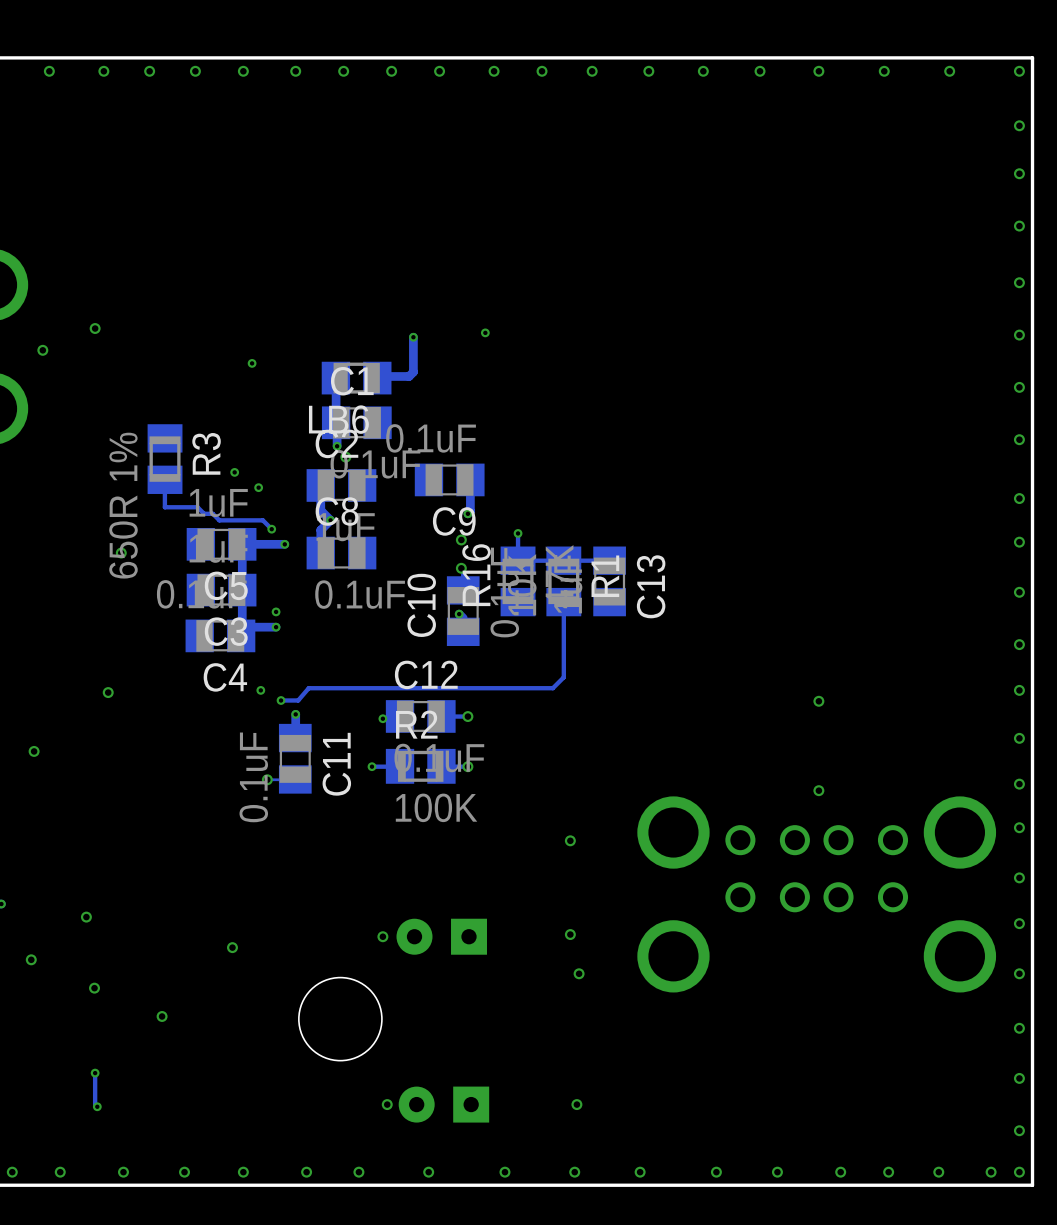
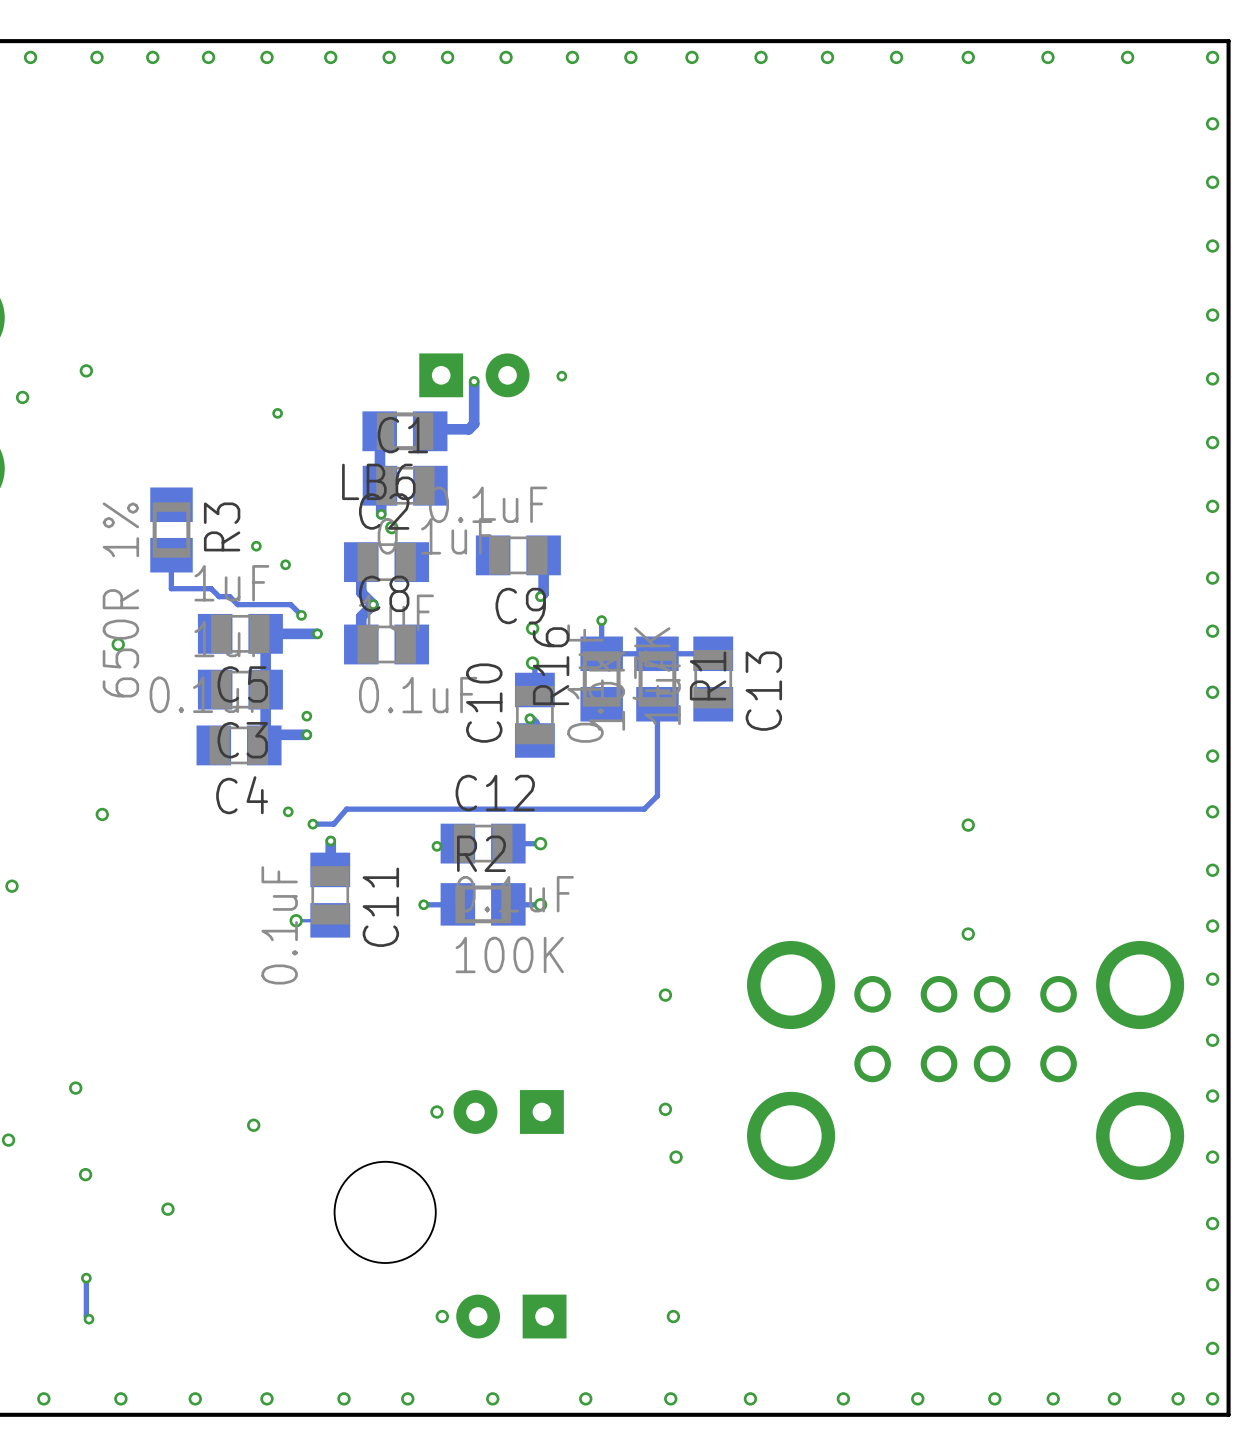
part: none -> (474, 375)

